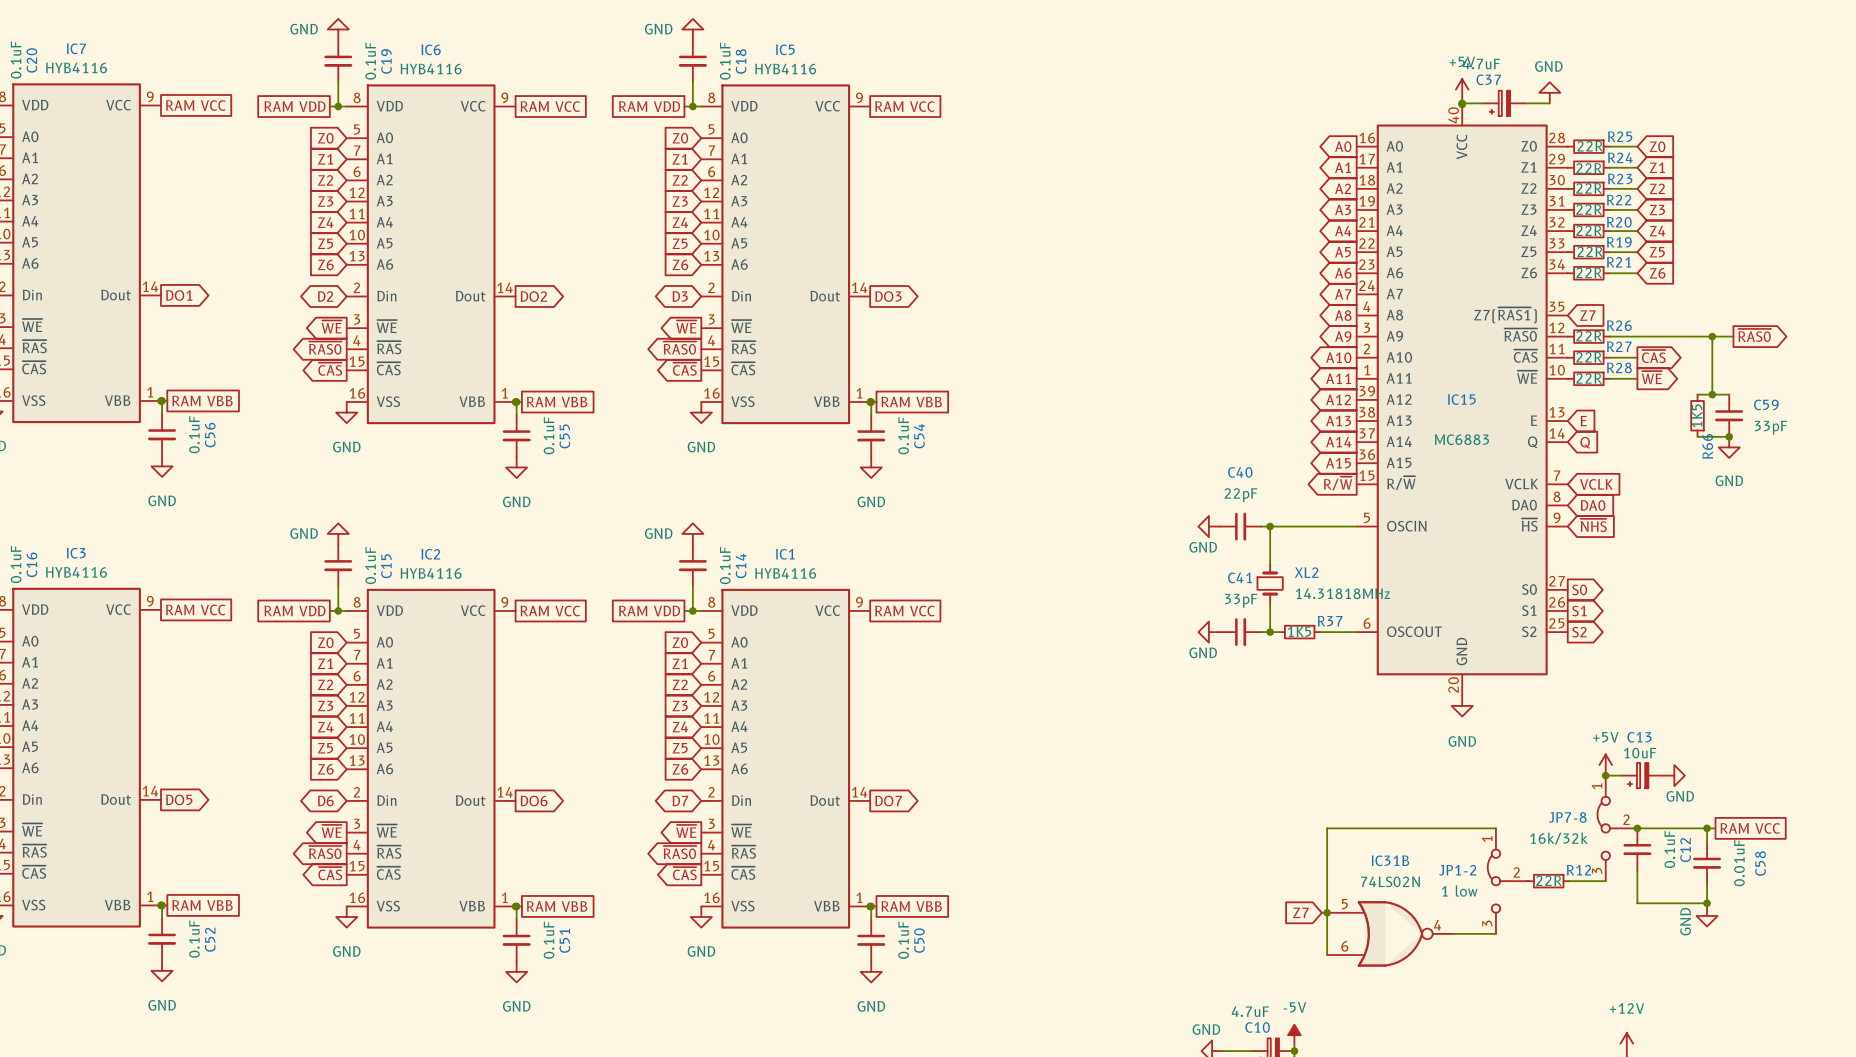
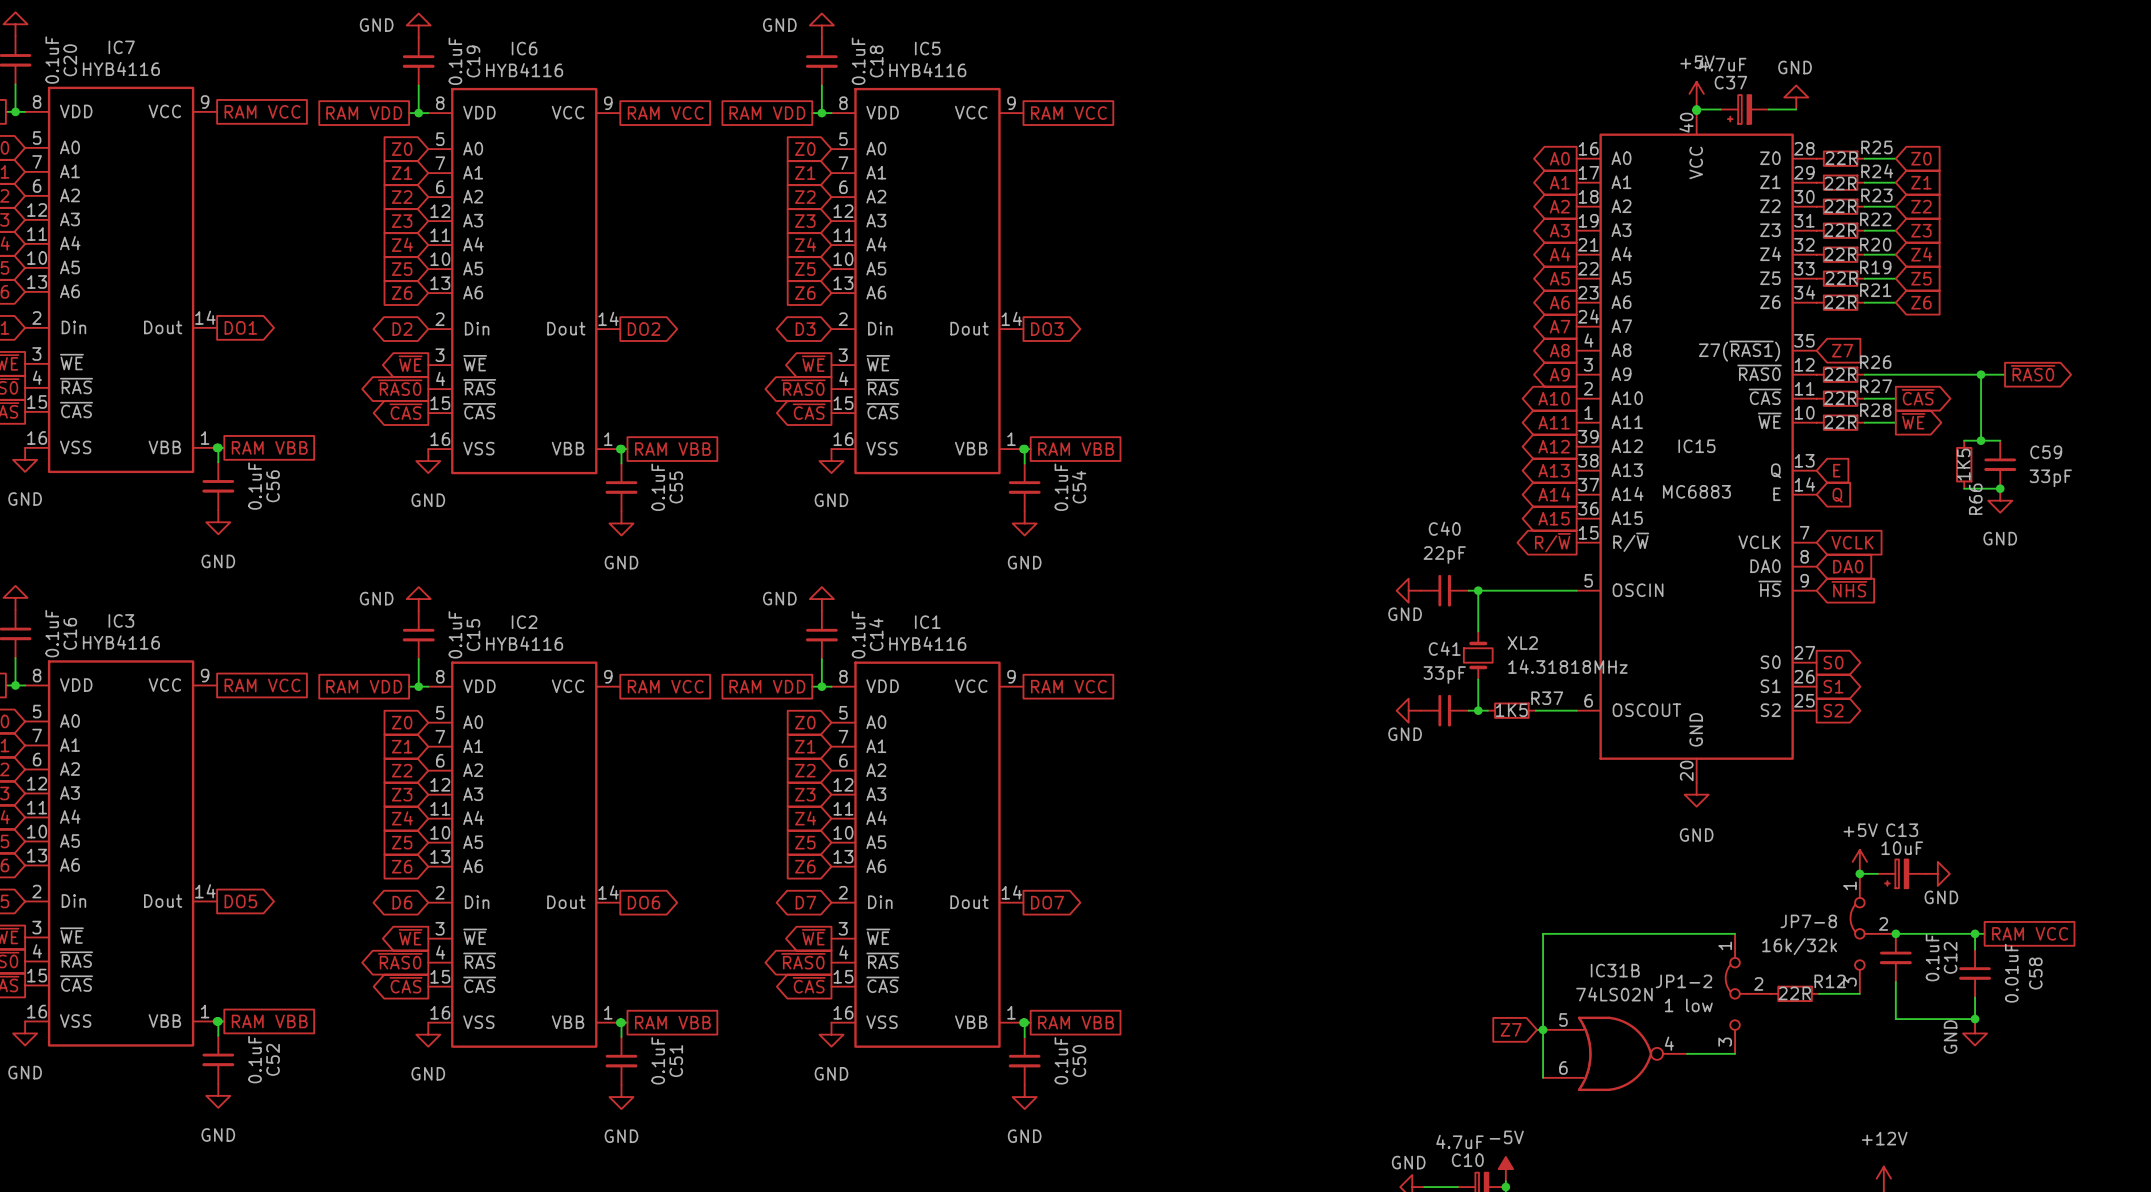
IC15 pin name: E (1534, 420) -> Q (1776, 470)
IC15 pin name: Q (1532, 442) -> E (1776, 494)

